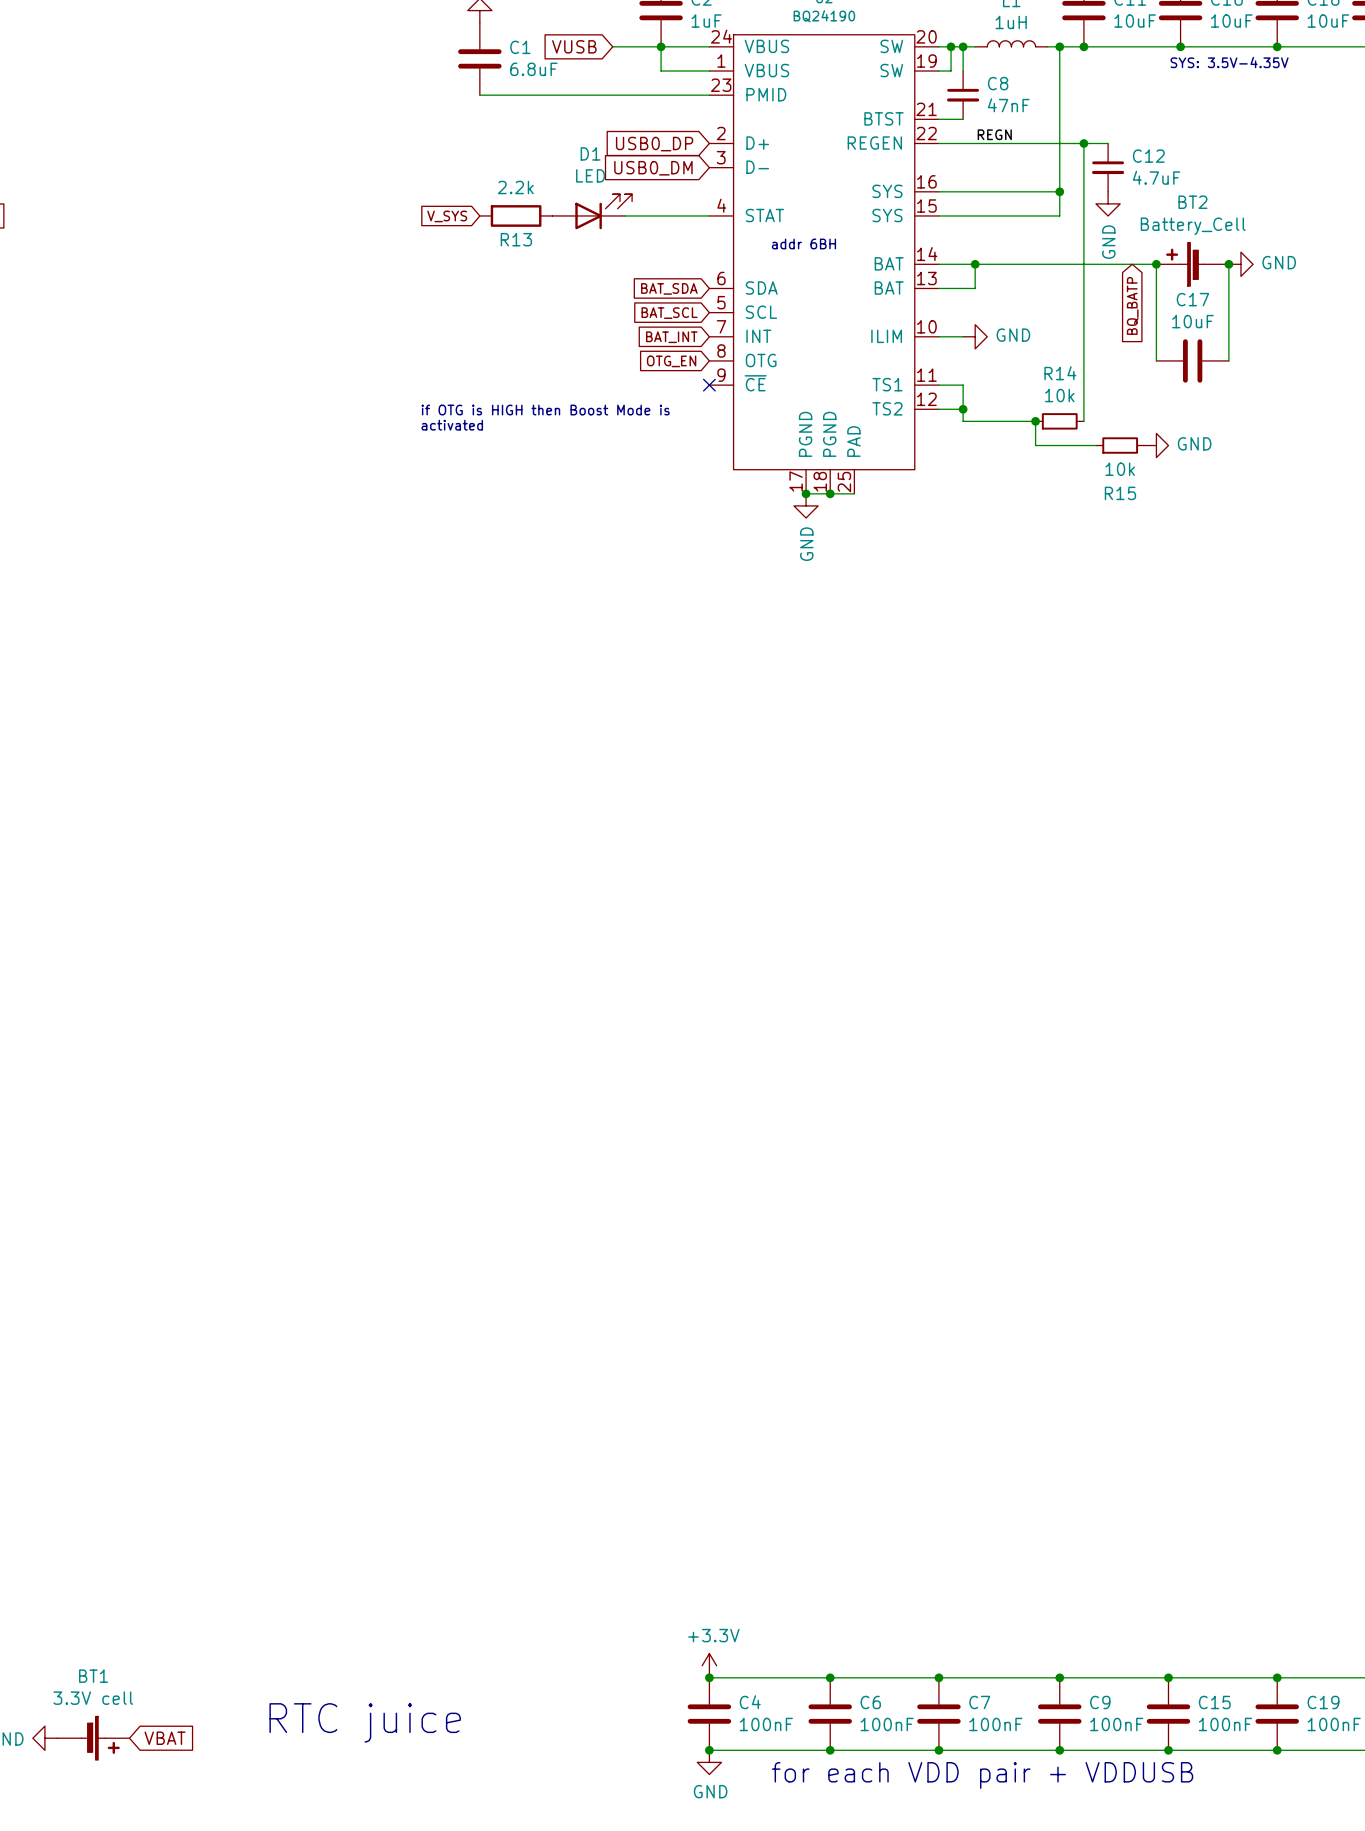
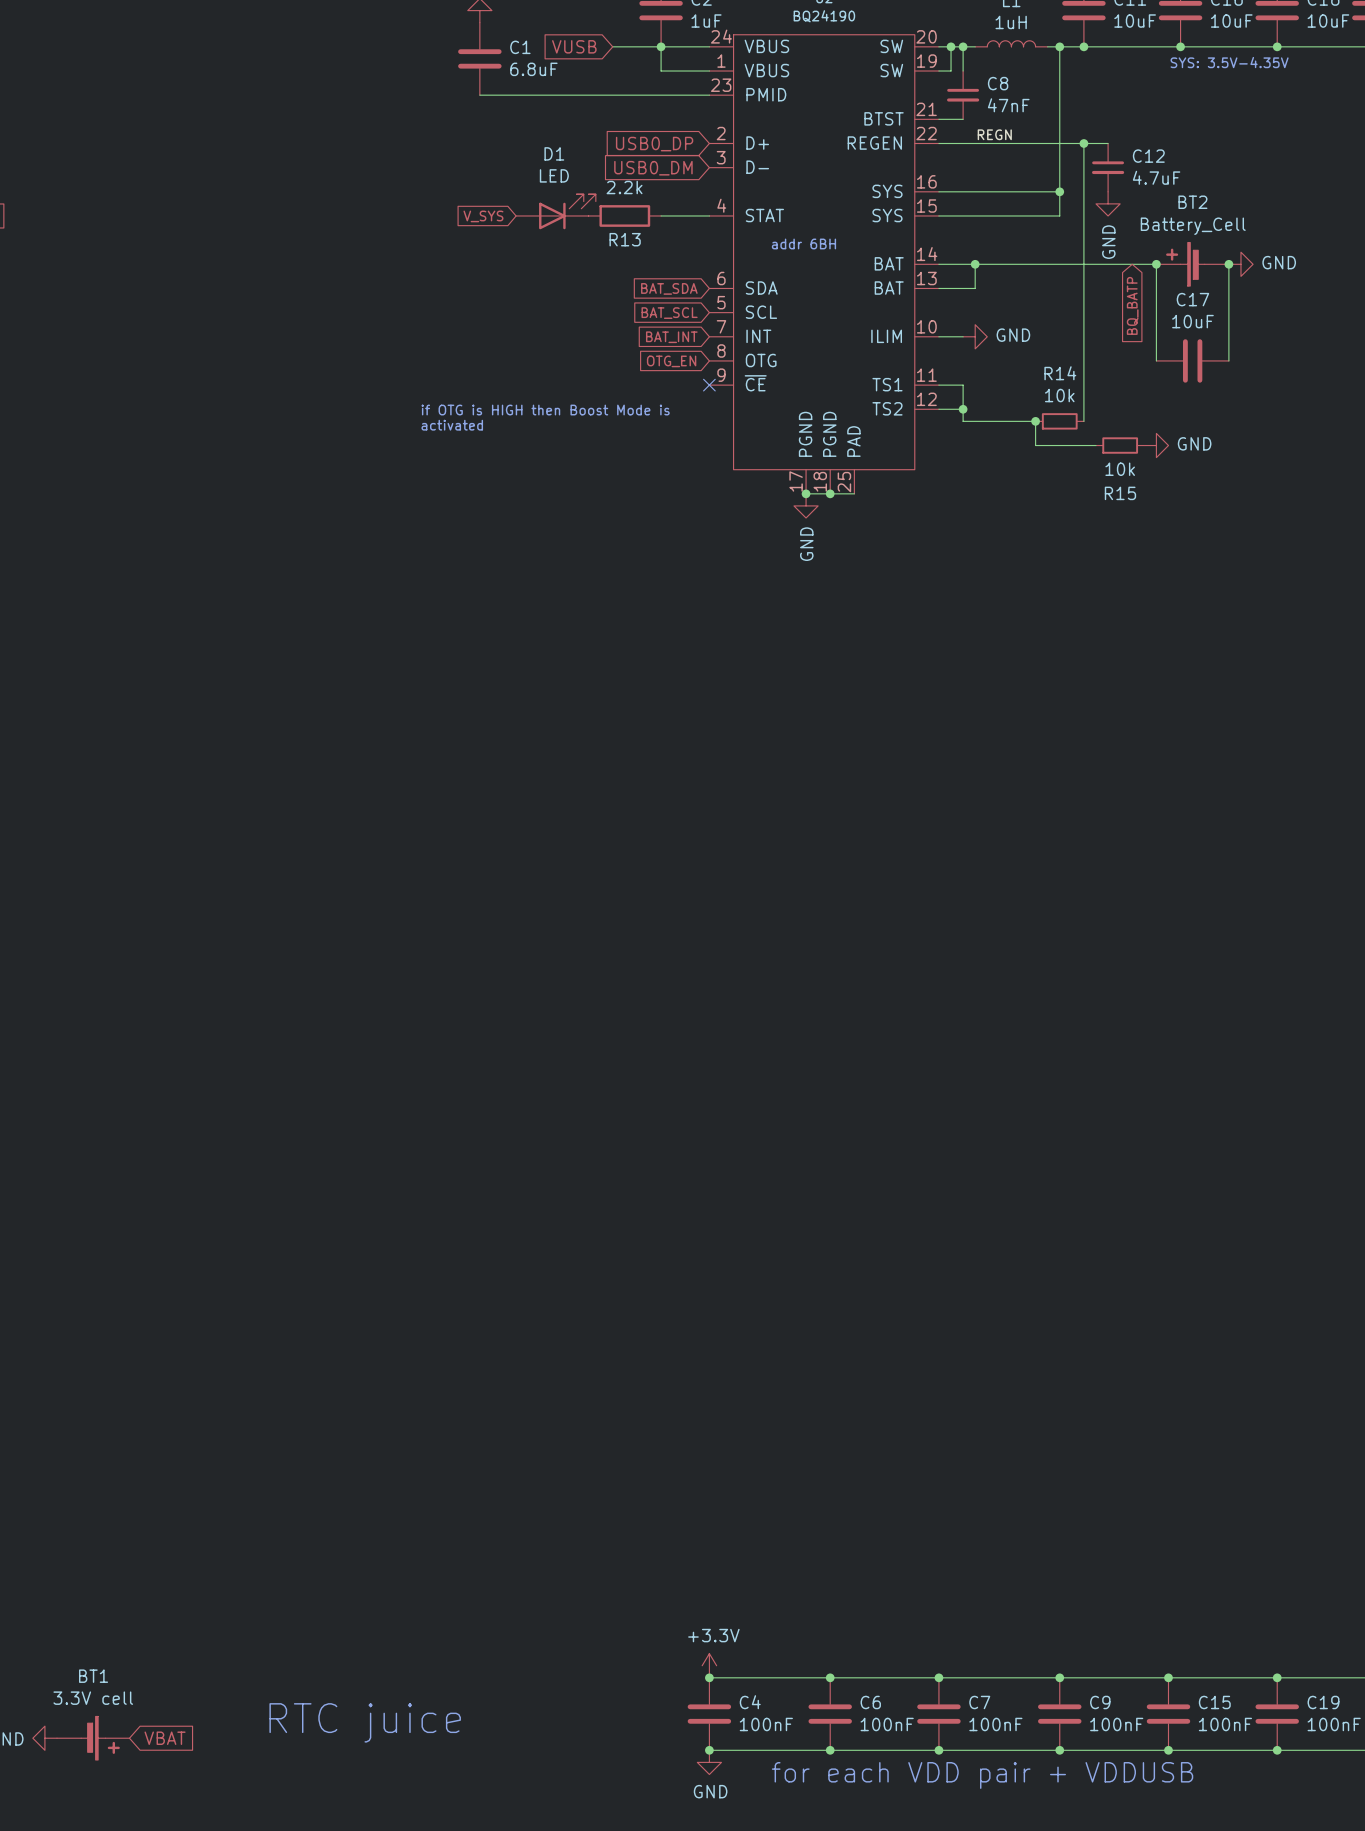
D1 position: (592, 211) -> (555, 211)
R13 position: (516, 215) -> (624, 215)
wire: (624, 215) (661, 215) -> none
global label position: V_SYS (447, 216) -> V_SYS (483, 216)

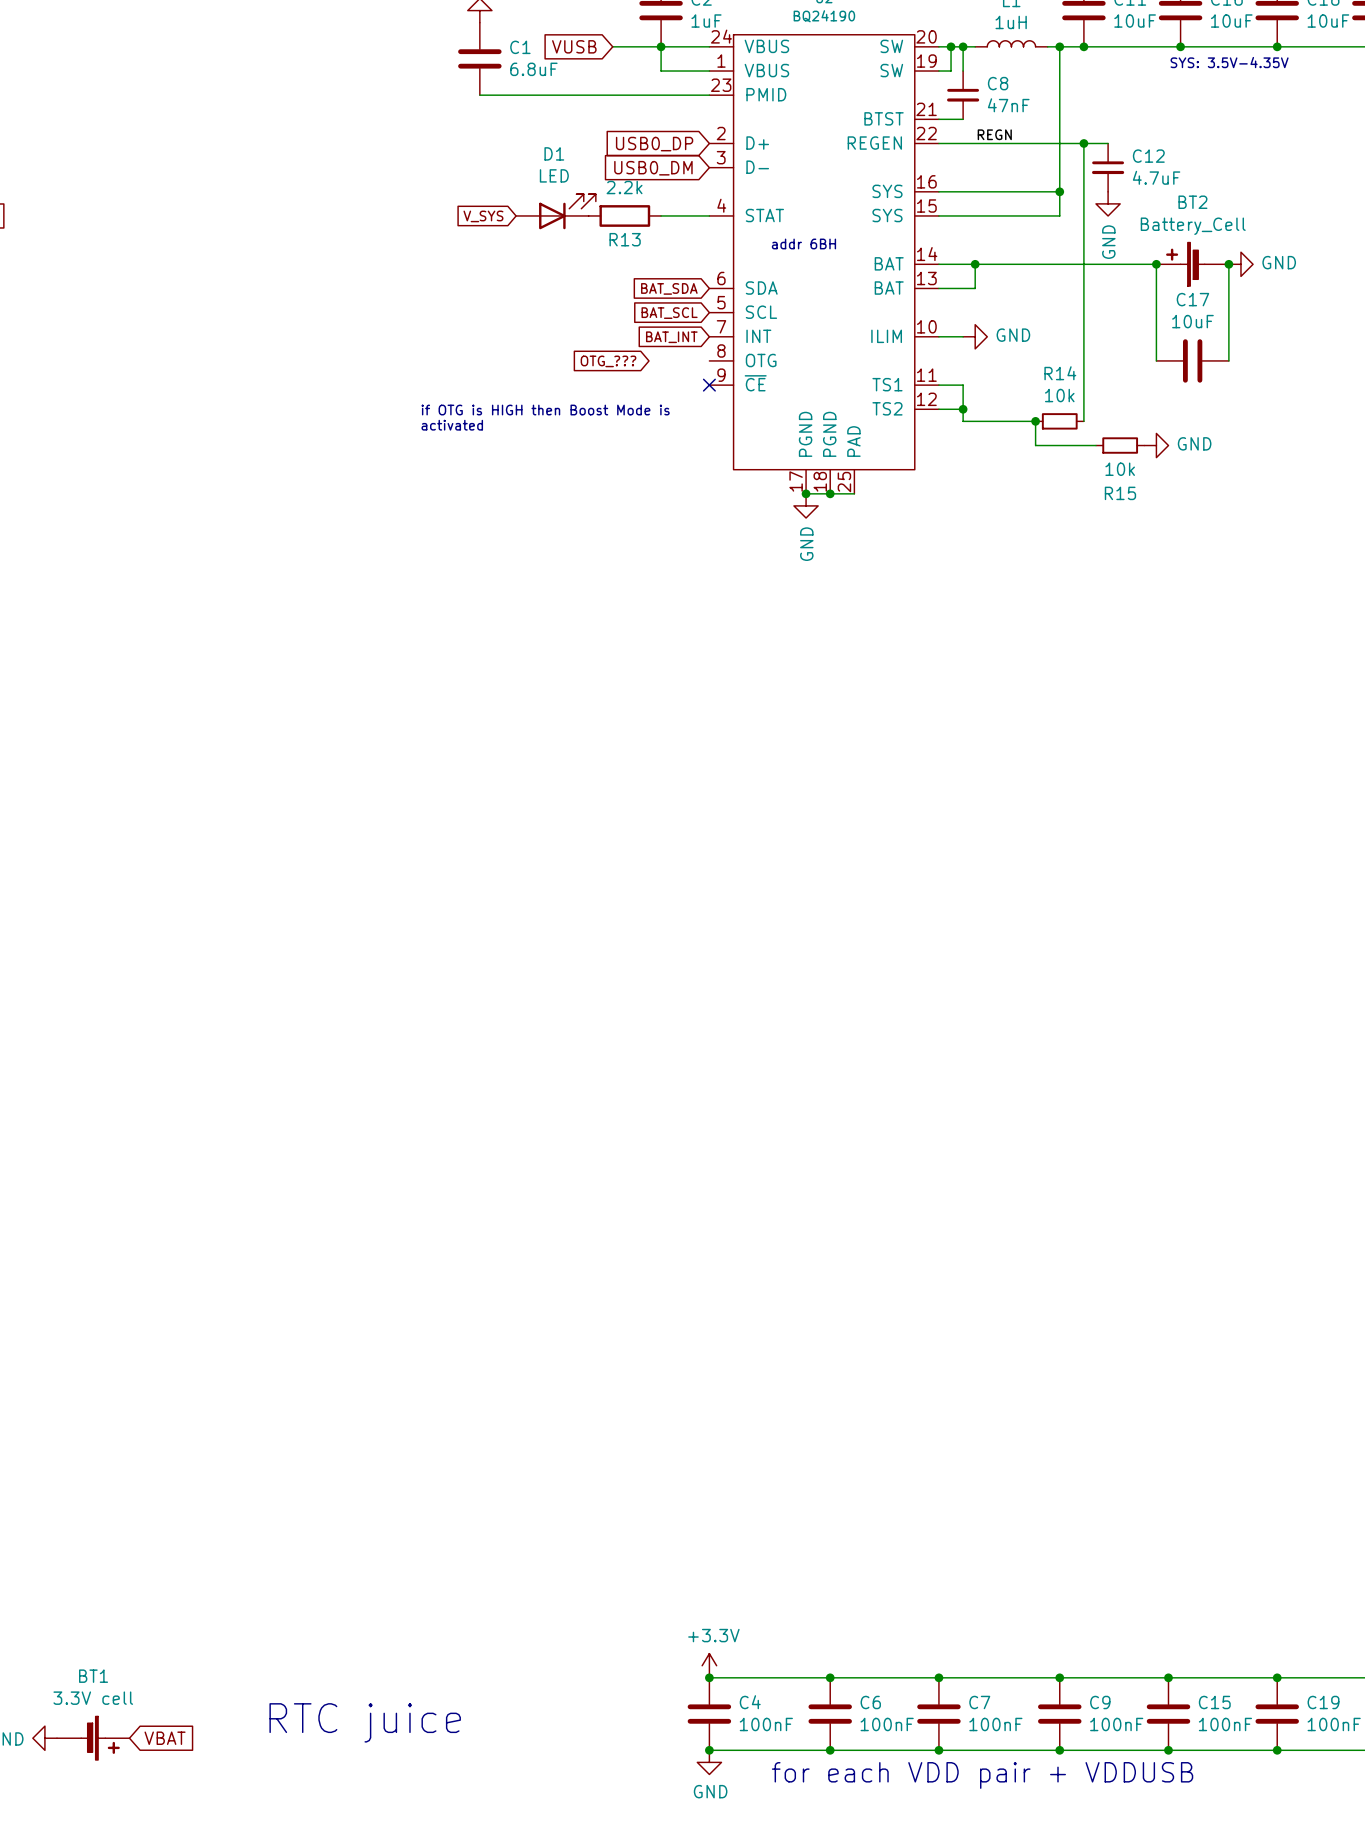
global label: BQ_BATP (1132, 305) -> none
global label: OTG_EN (671, 361) -> OTG_??? (608, 361)

